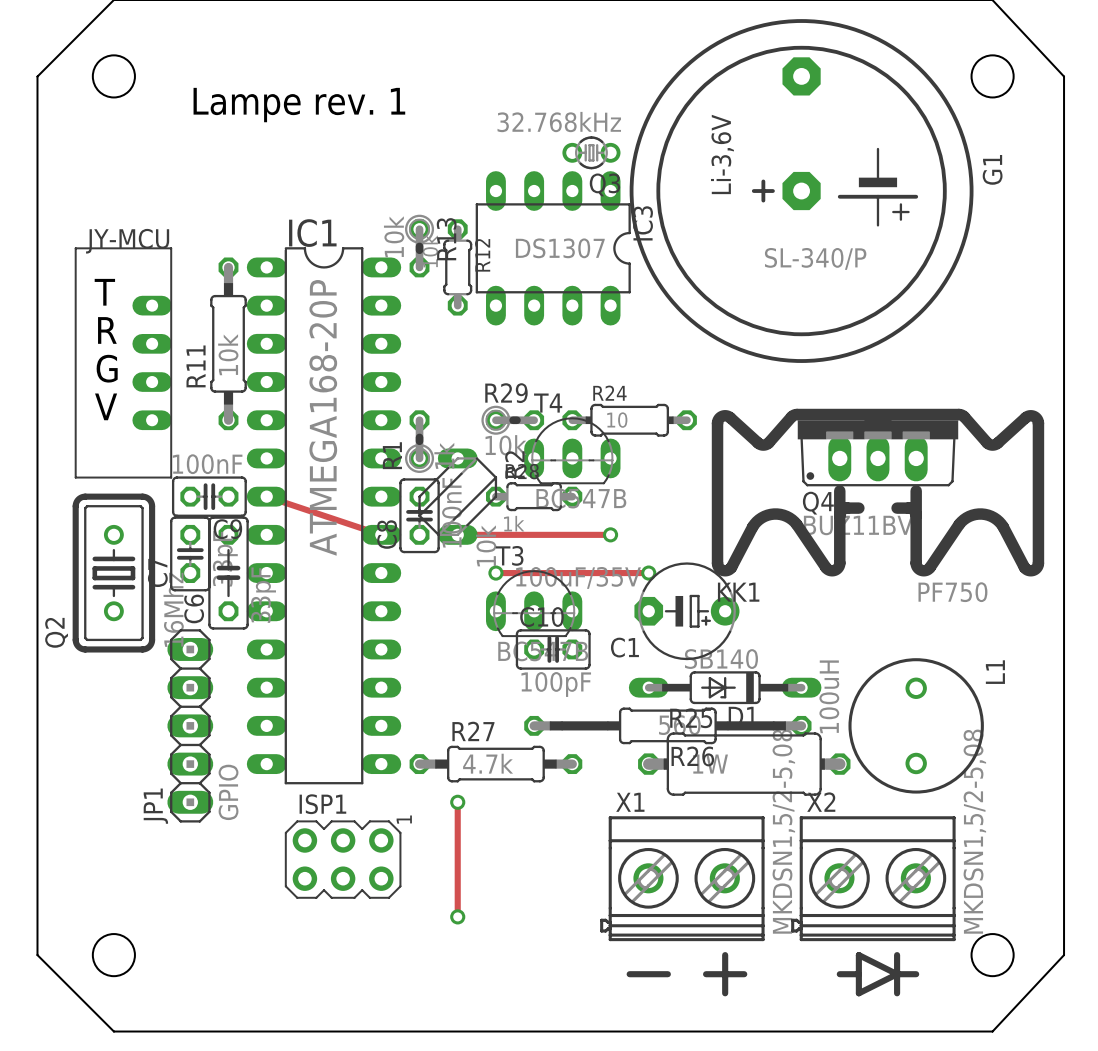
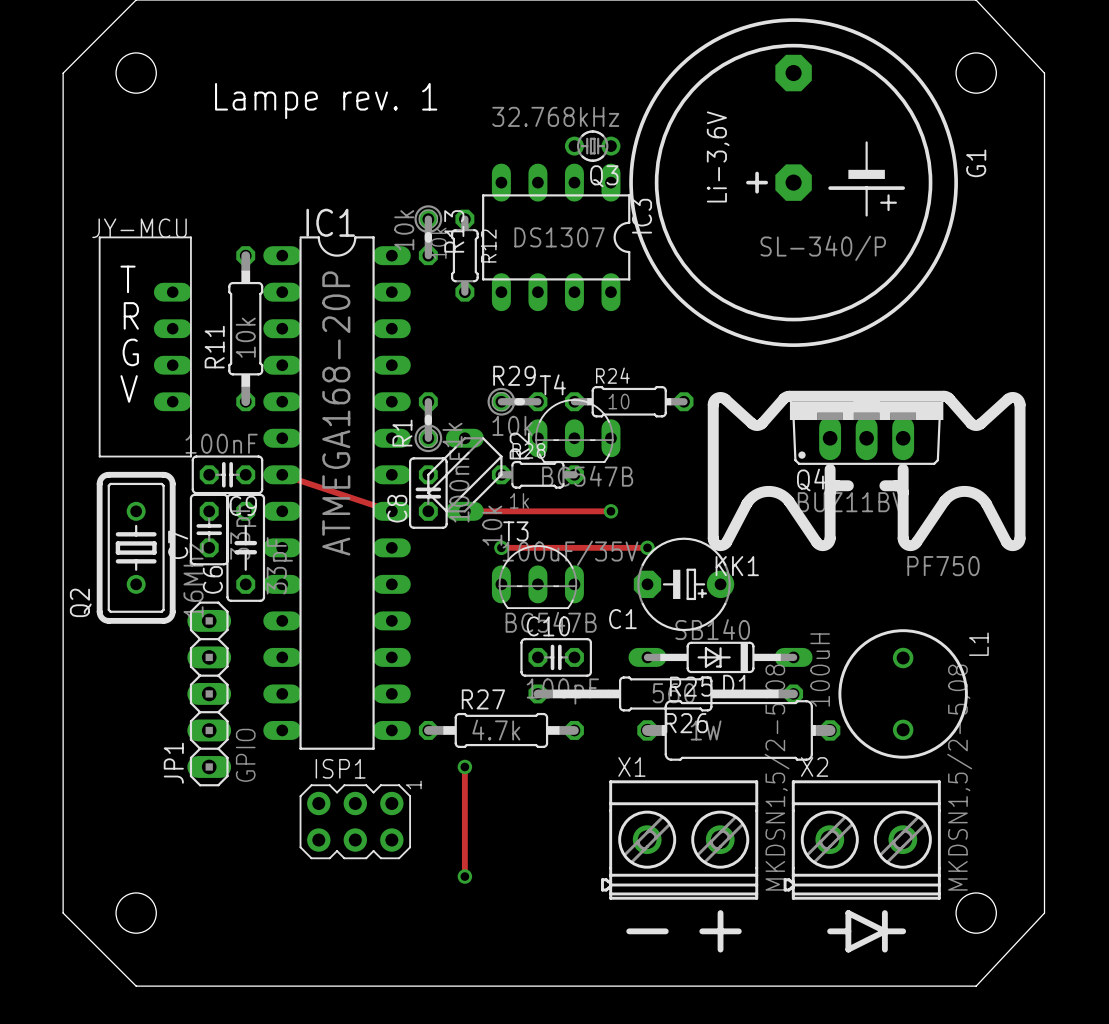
C10 position: (553, 649) -> (556, 657)

